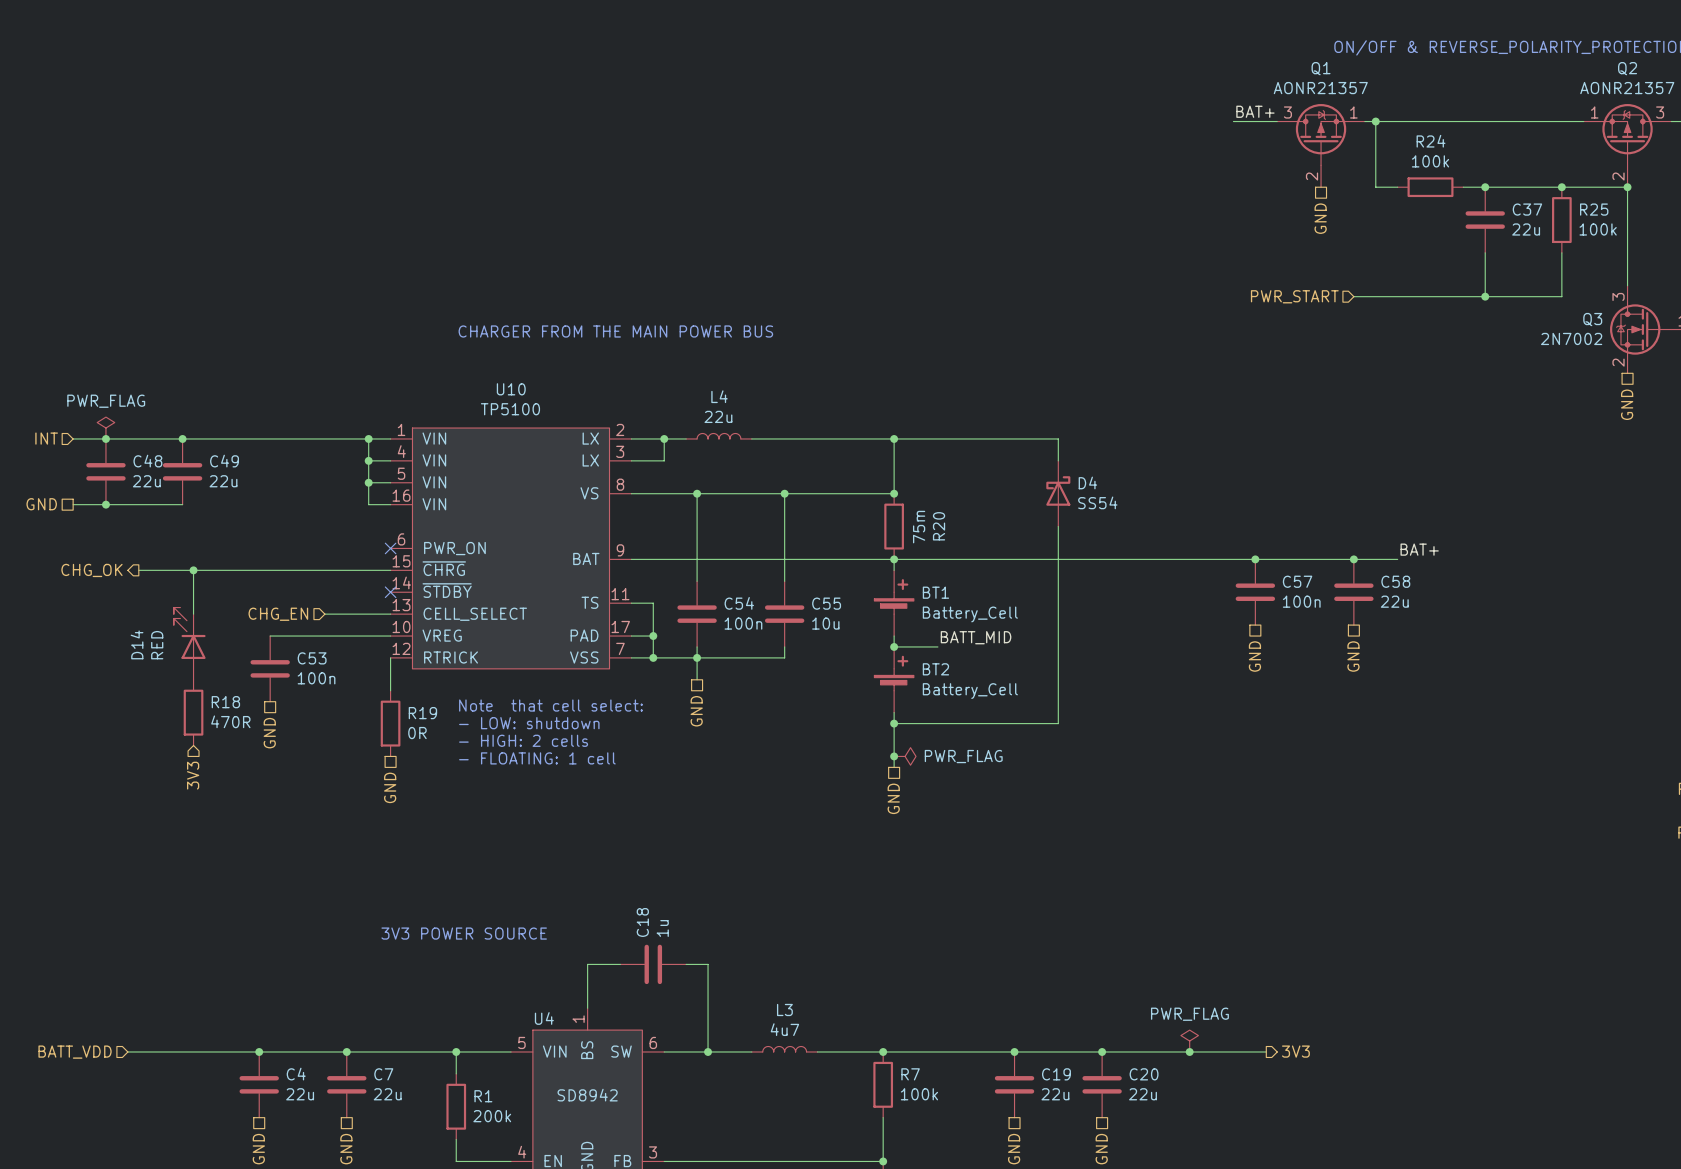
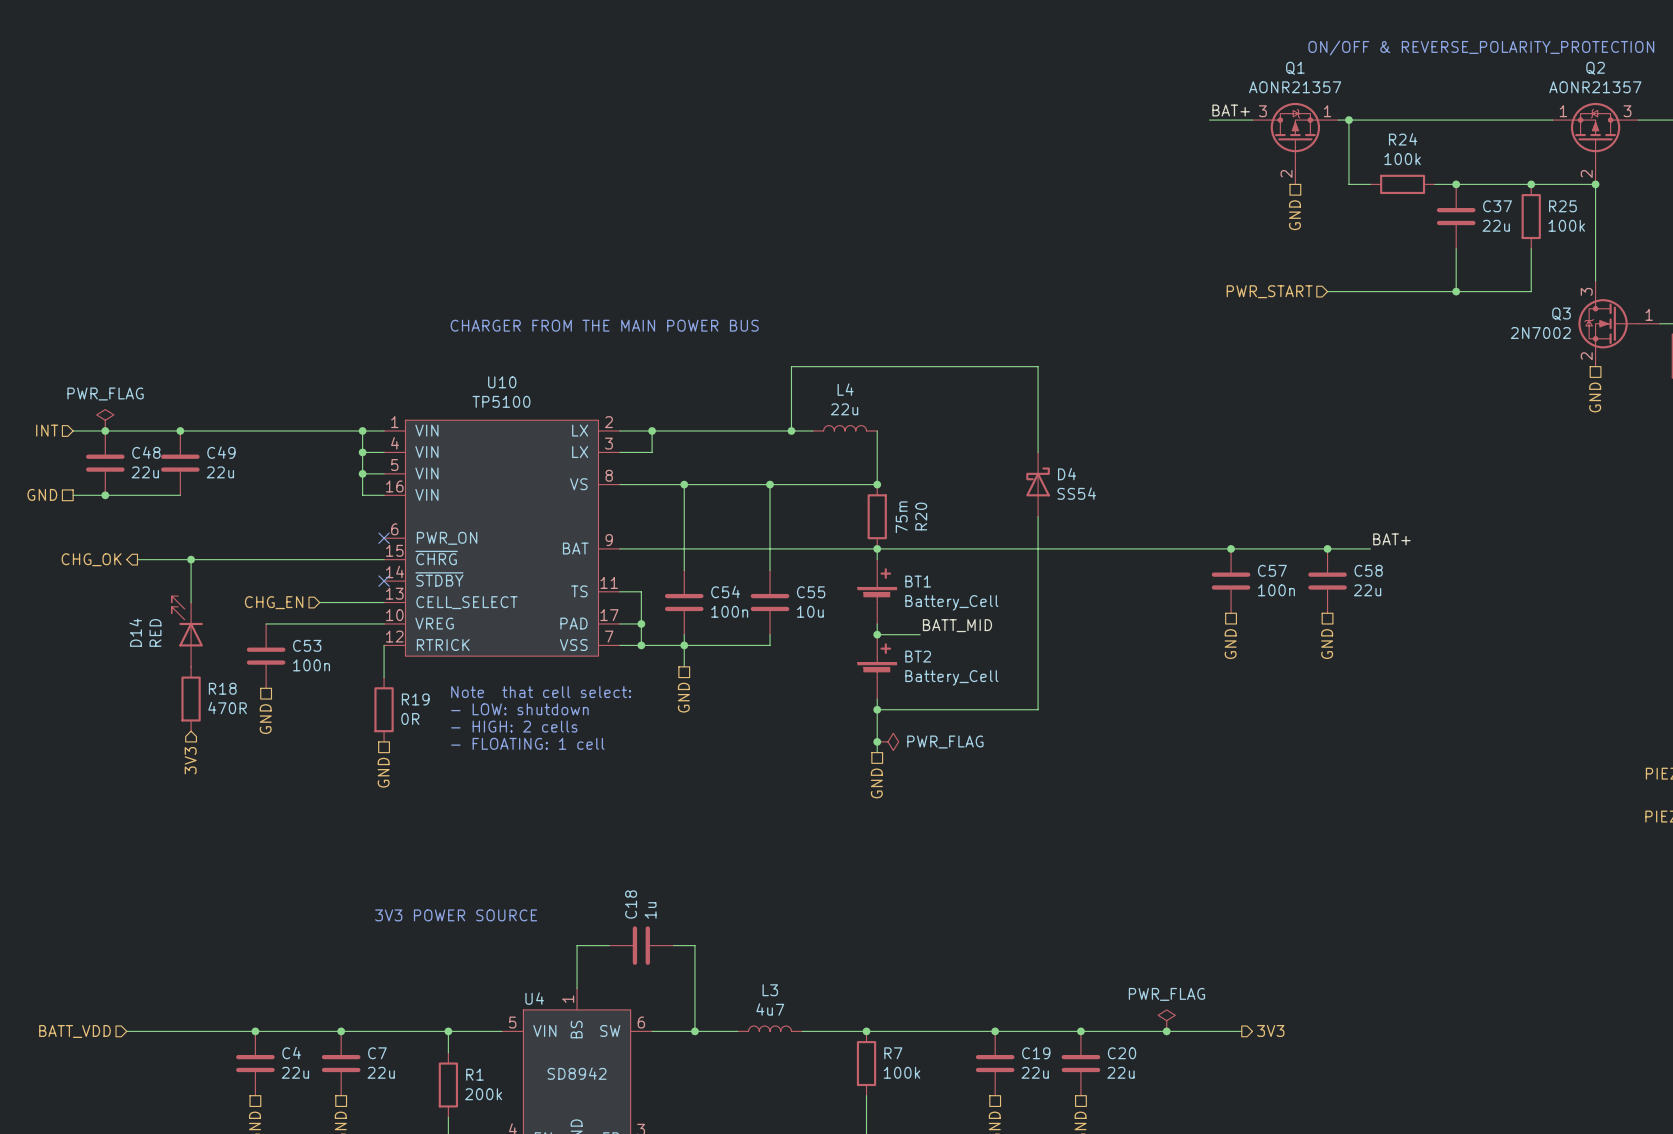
L4 position: (718, 436) -> (845, 428)
wire: none -> (673, 430) (737, 430)
junction: none -> (791, 430)
wire: (828, 438) (1058, 438) -> (791, 430) (791, 366) (1038, 366) (1038, 430)
junction: (894, 438) -> none

